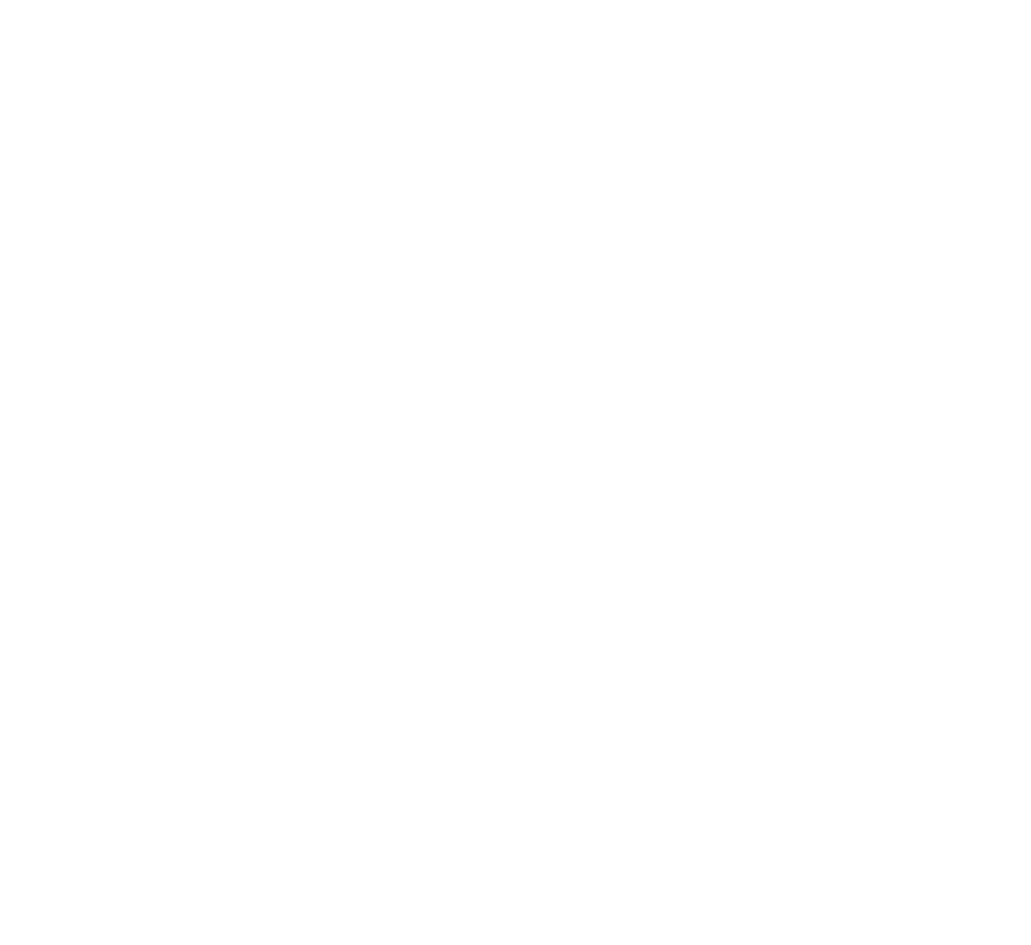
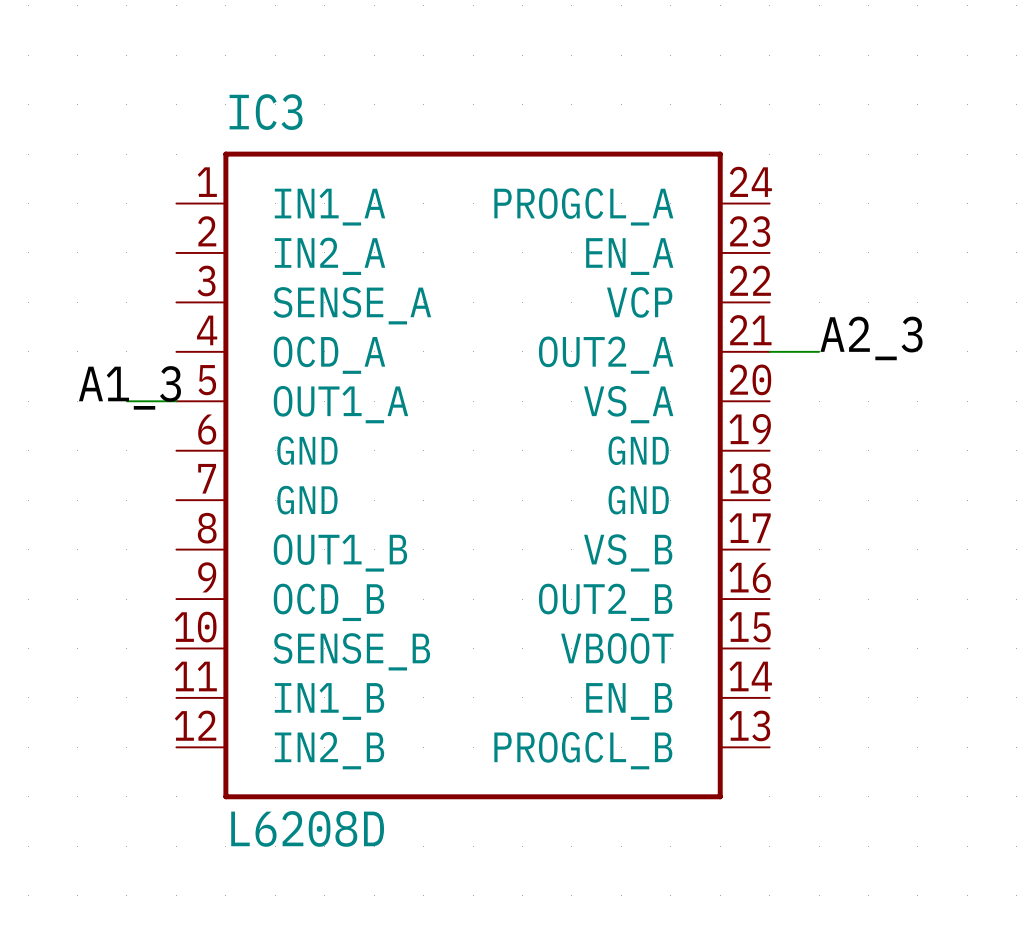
label: none -> A2_3 (871, 338)
wire: none -> (769, 351) (819, 351)
label: none -> A1_3 (129, 387)
wire: none -> (126, 401) (176, 401)
IC3: none -> L6208D (473, 475)

